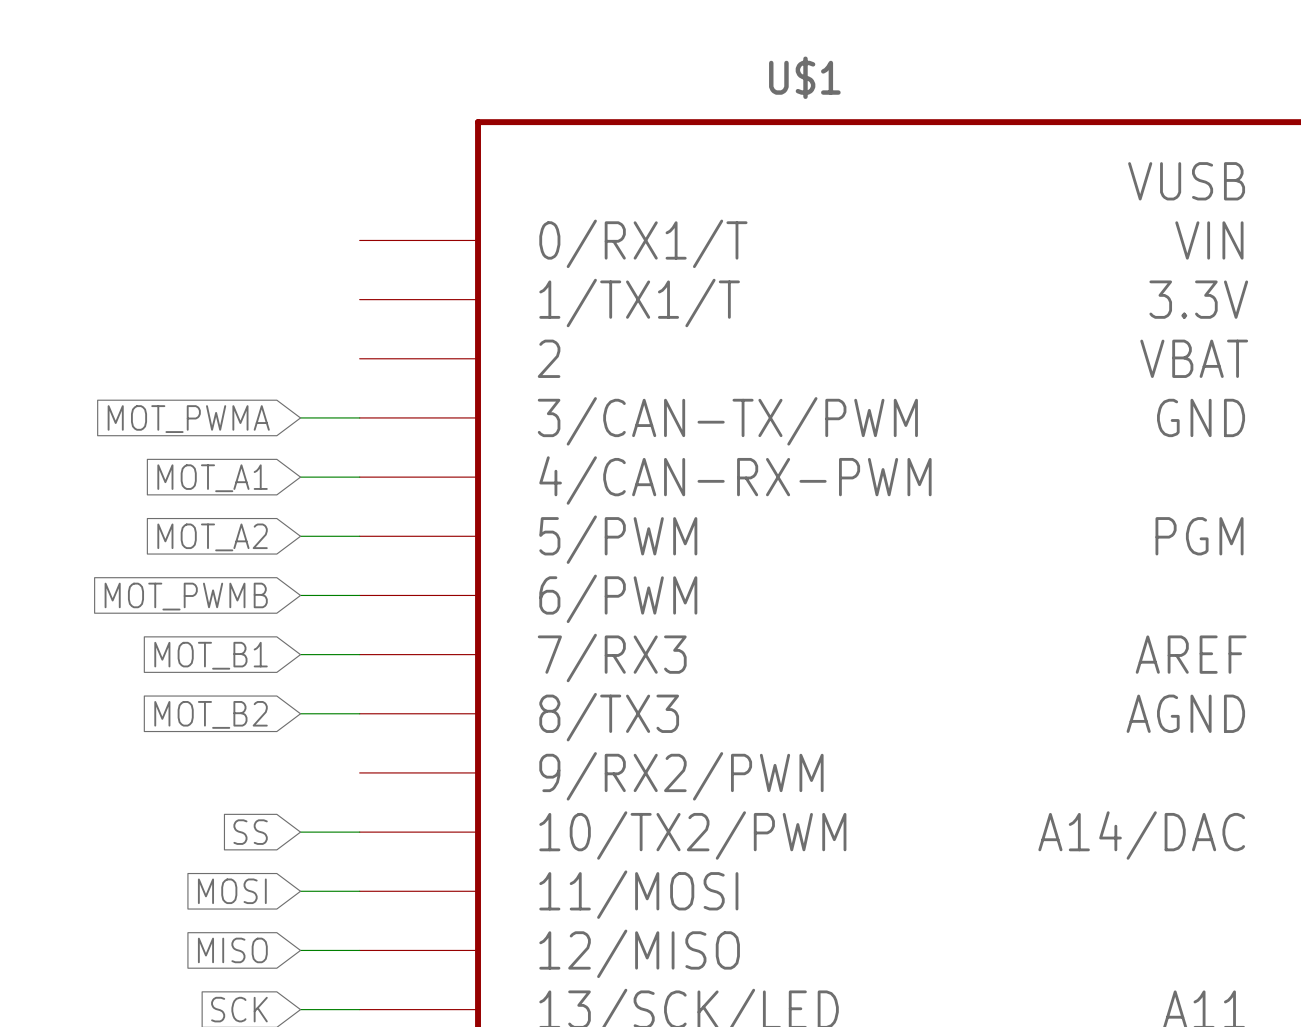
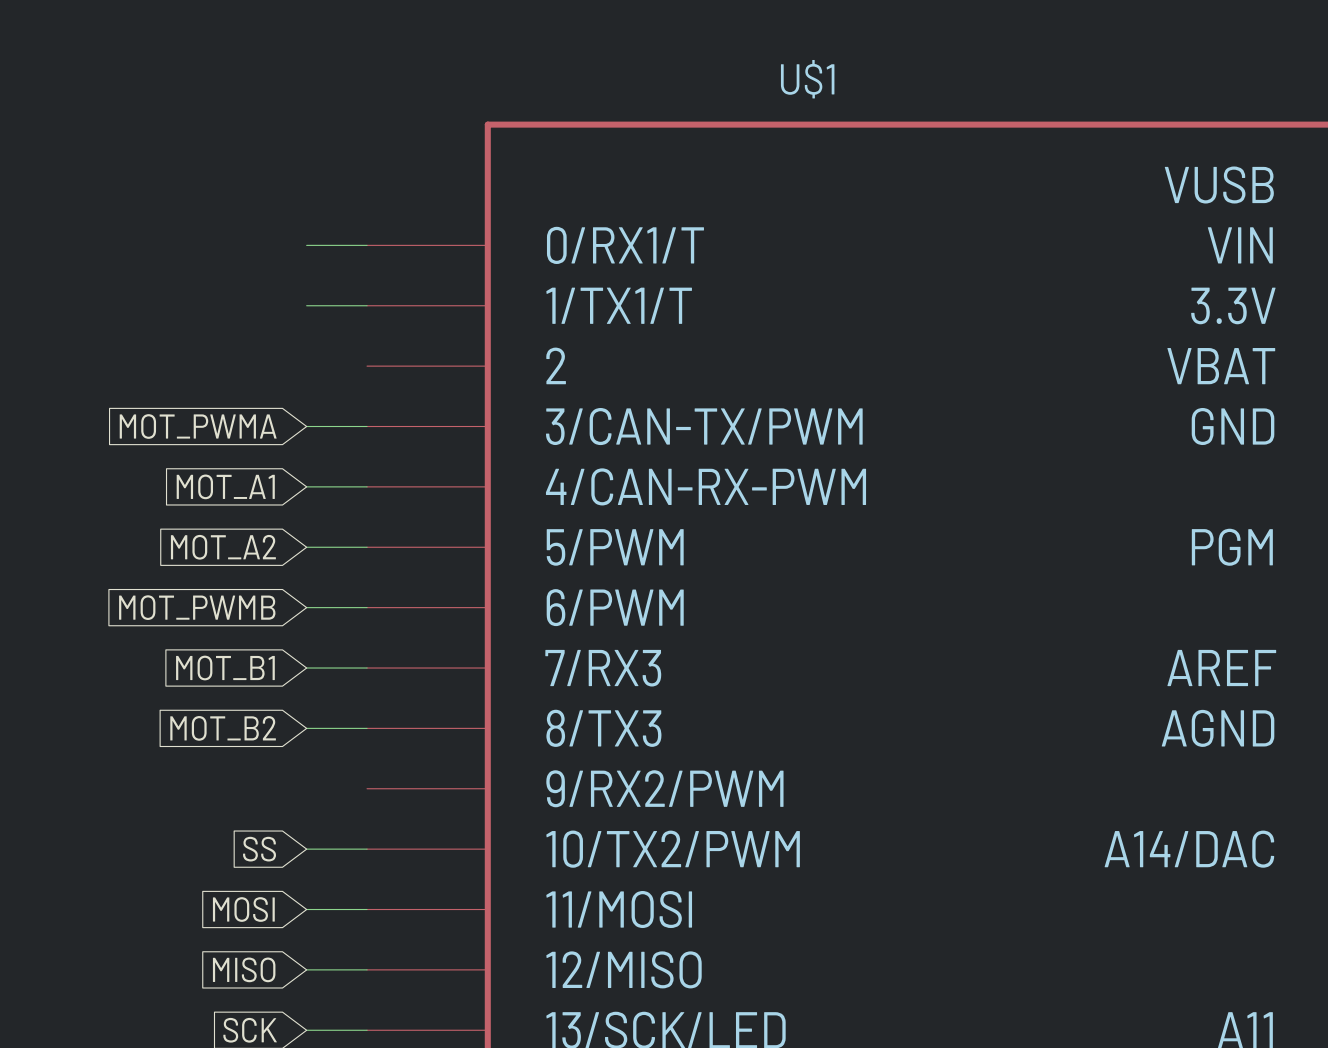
wire: none -> (306, 245) (367, 245)
wire: none -> (306, 305) (367, 305)

